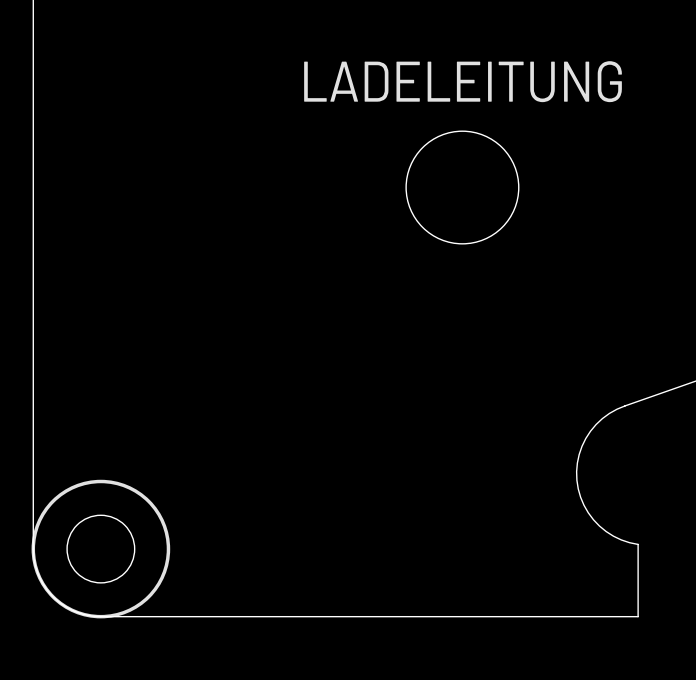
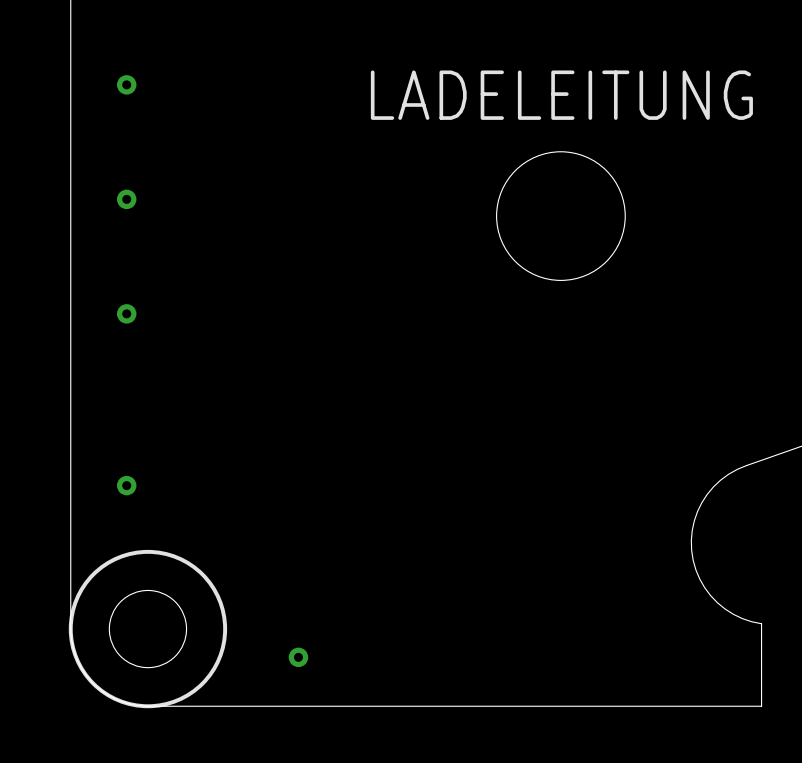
via: none -> (126, 84)
via: none -> (126, 199)
via: none -> (126, 313)
via: none -> (126, 485)
via: none -> (298, 657)

